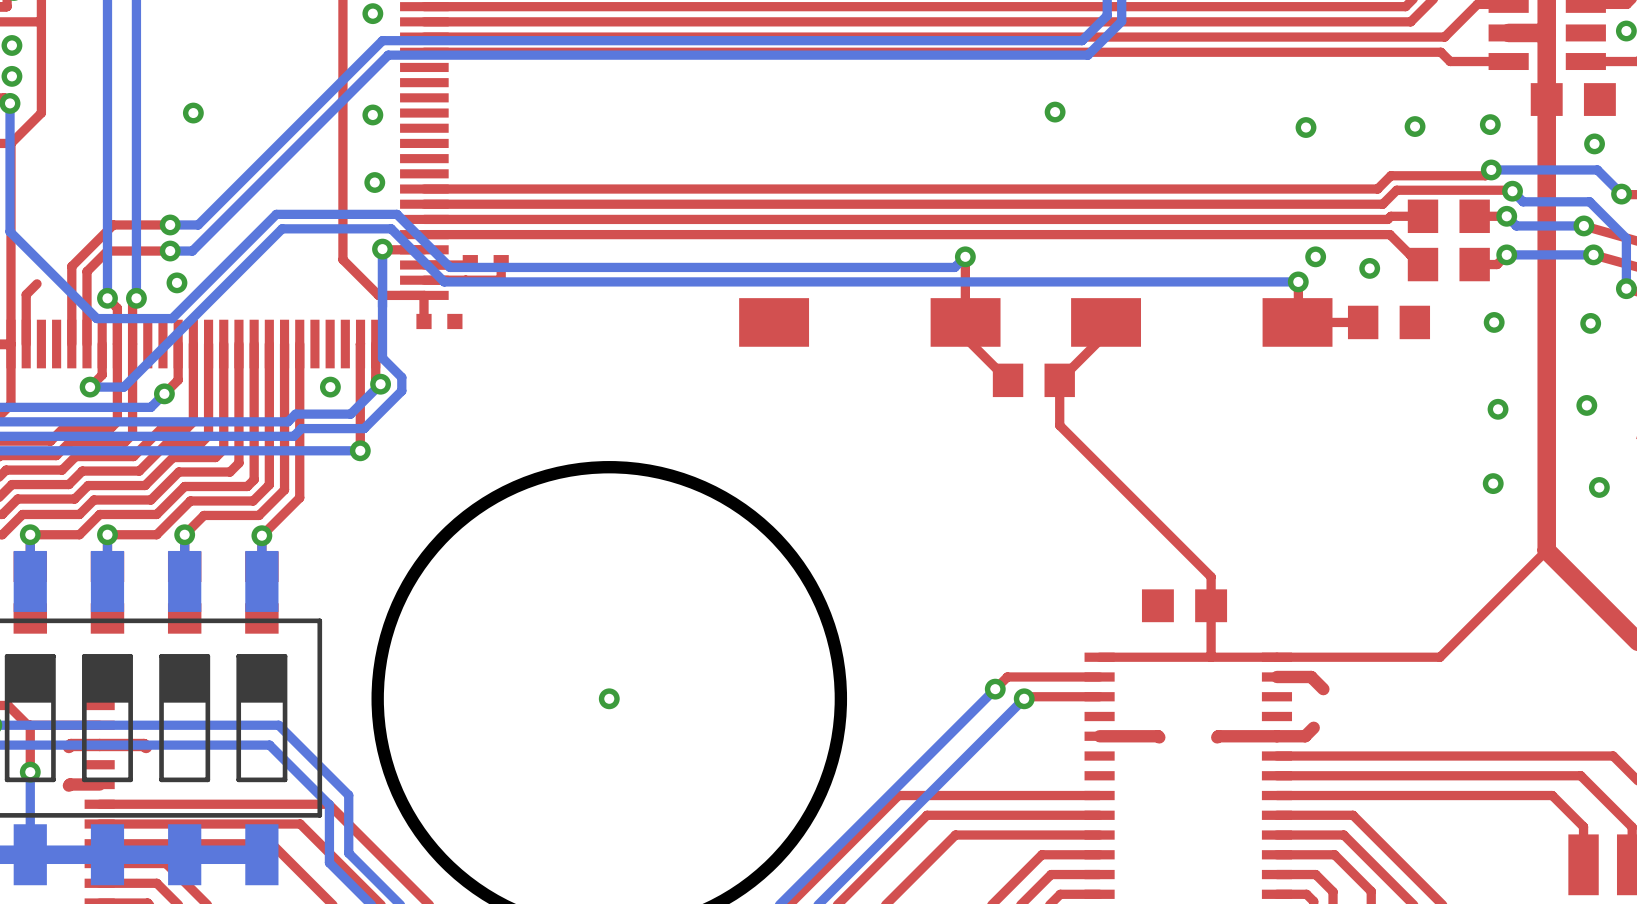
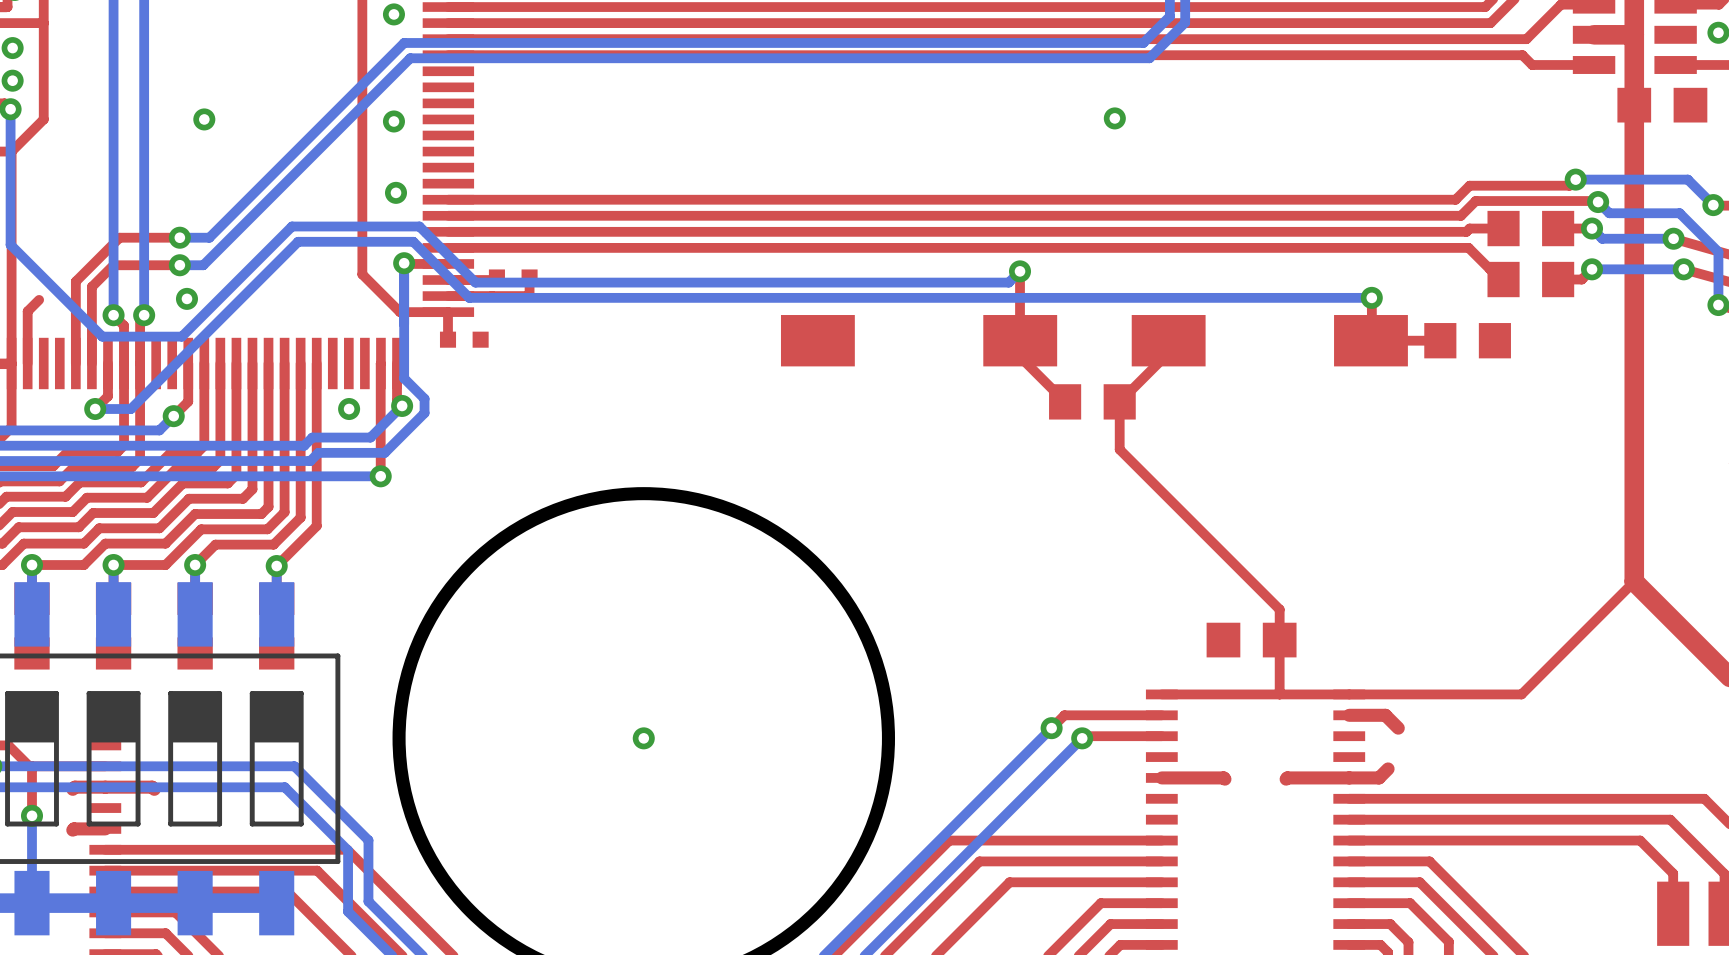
via: (1490, 124) -> none
via: (1415, 126) -> none
via: (1306, 127) -> none
via: (1594, 143) -> none
via: (1315, 256) -> none
via: (1369, 268) -> none
via: (1494, 322) -> none
via: (1590, 323) -> none
via: (1586, 405) -> none
via: (1498, 409) -> none
via: (1493, 483) -> none
via: (1599, 487) -> none

